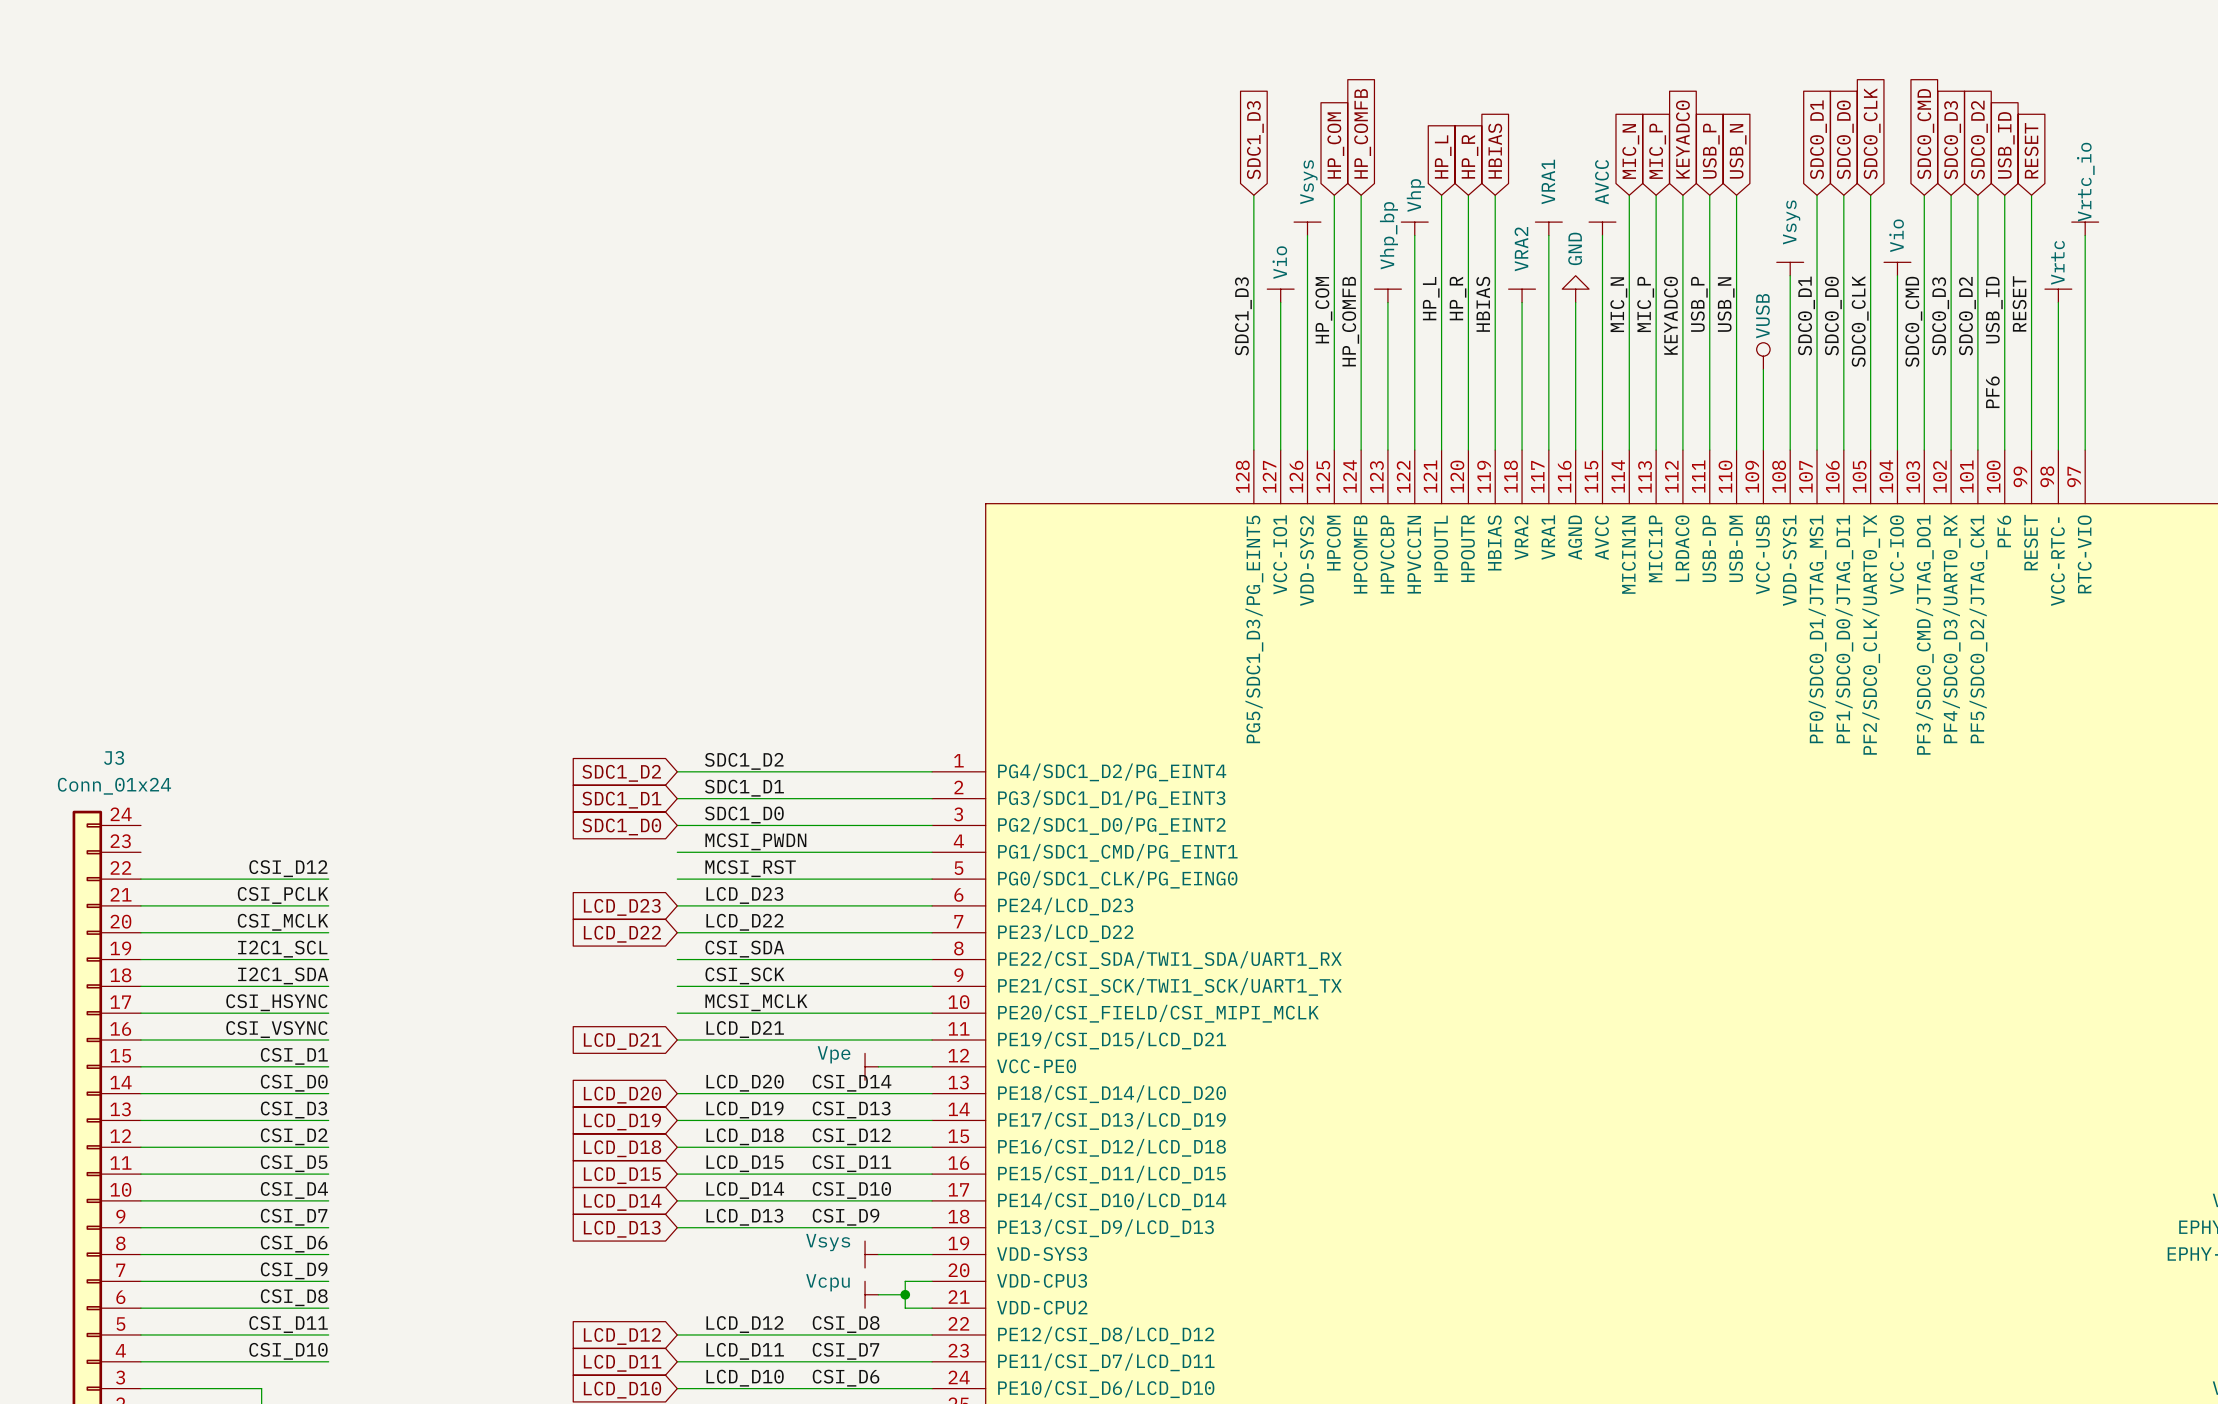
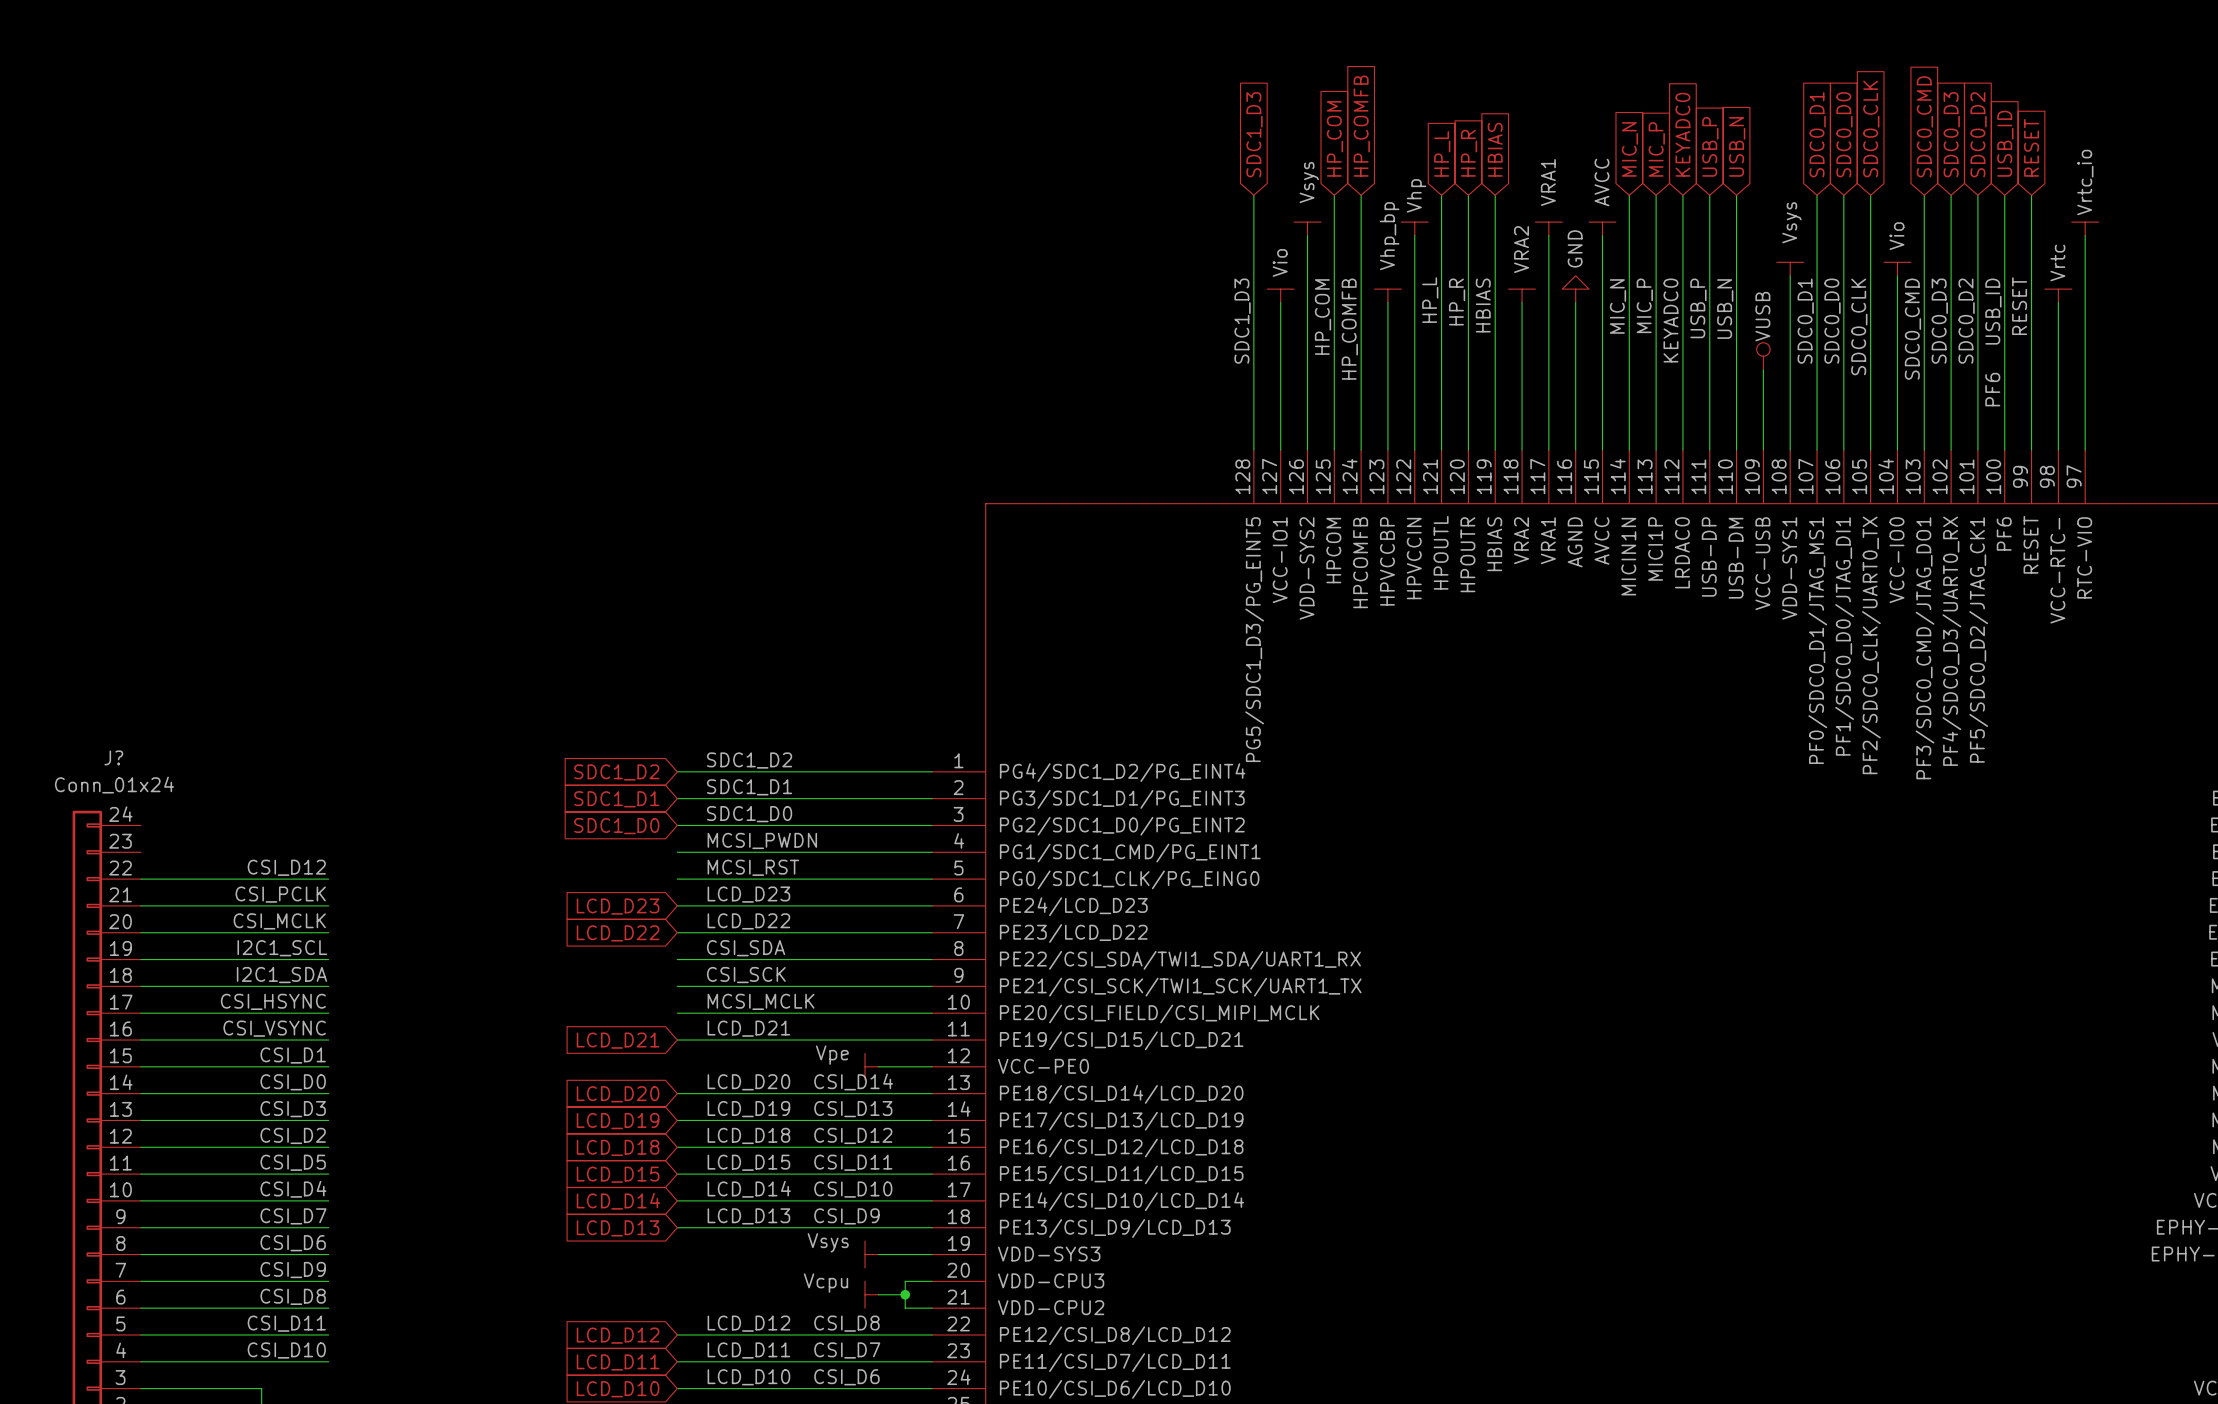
J3 name: J3 (114, 757) -> J? (113, 757)

